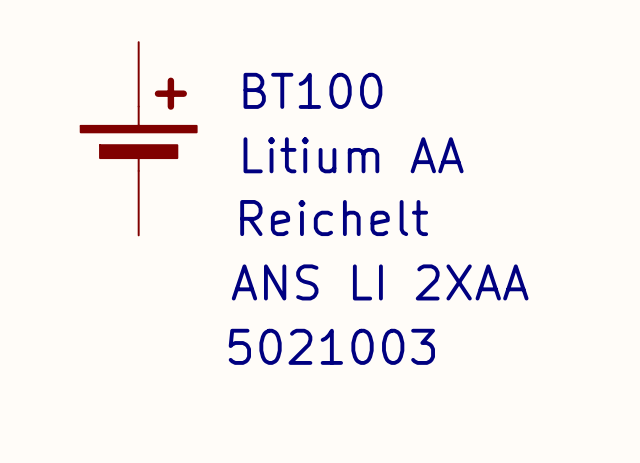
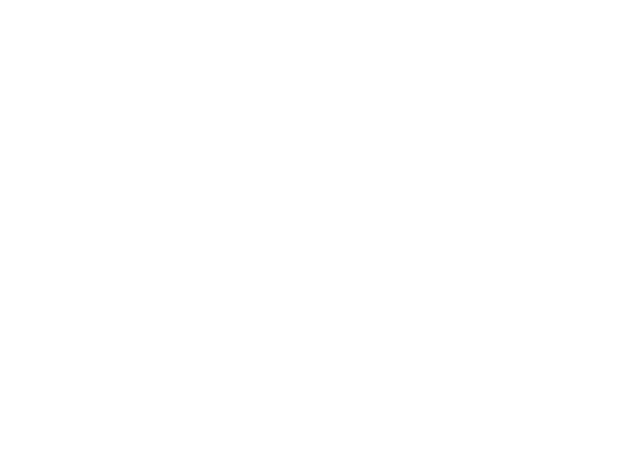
BT100: Litium AA (138, 138) -> none

